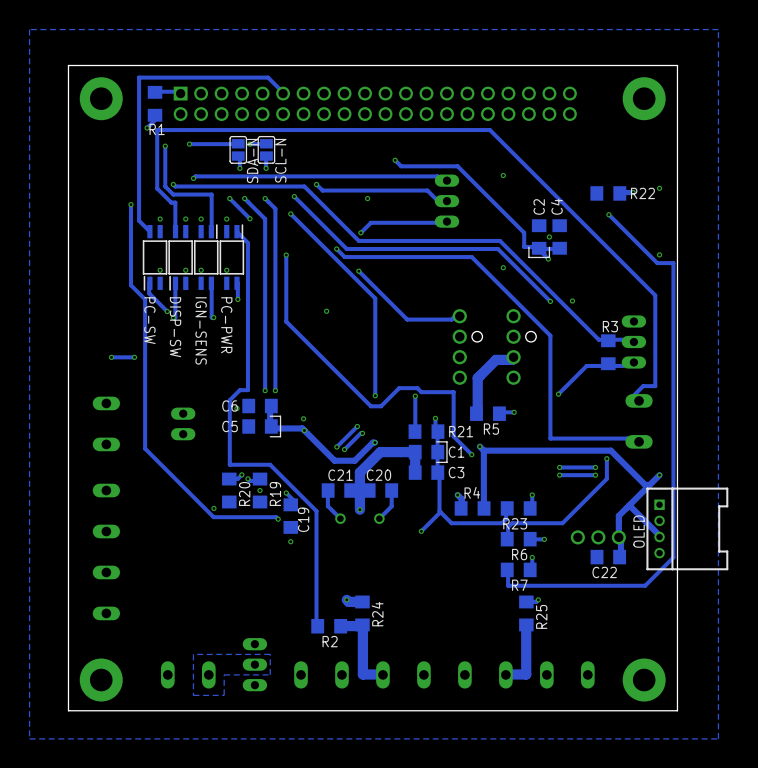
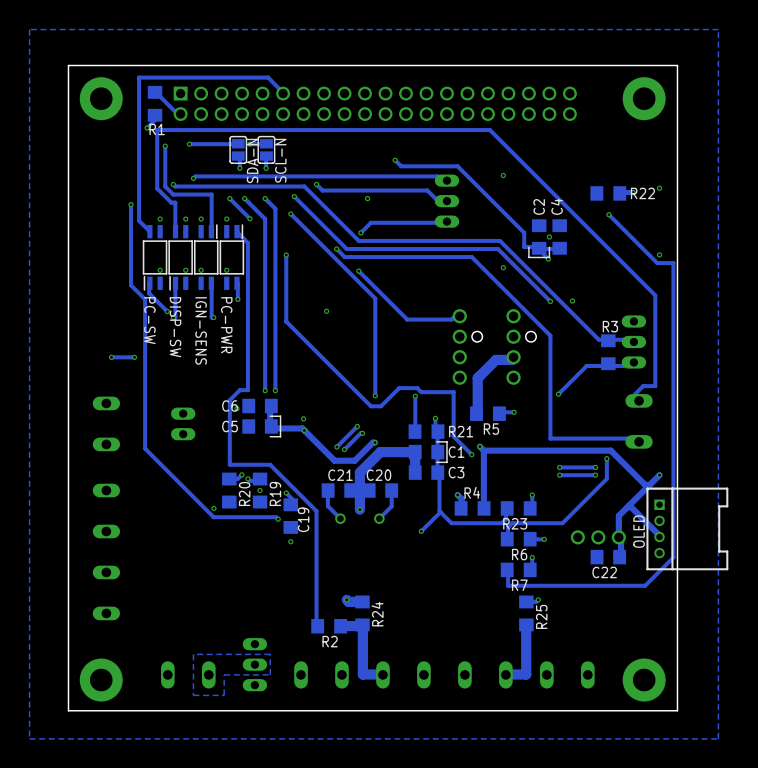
track: (155, 91) (179, 91) (180, 93) -> none
track: none -> (155, 92) (177, 113) (180, 114)

